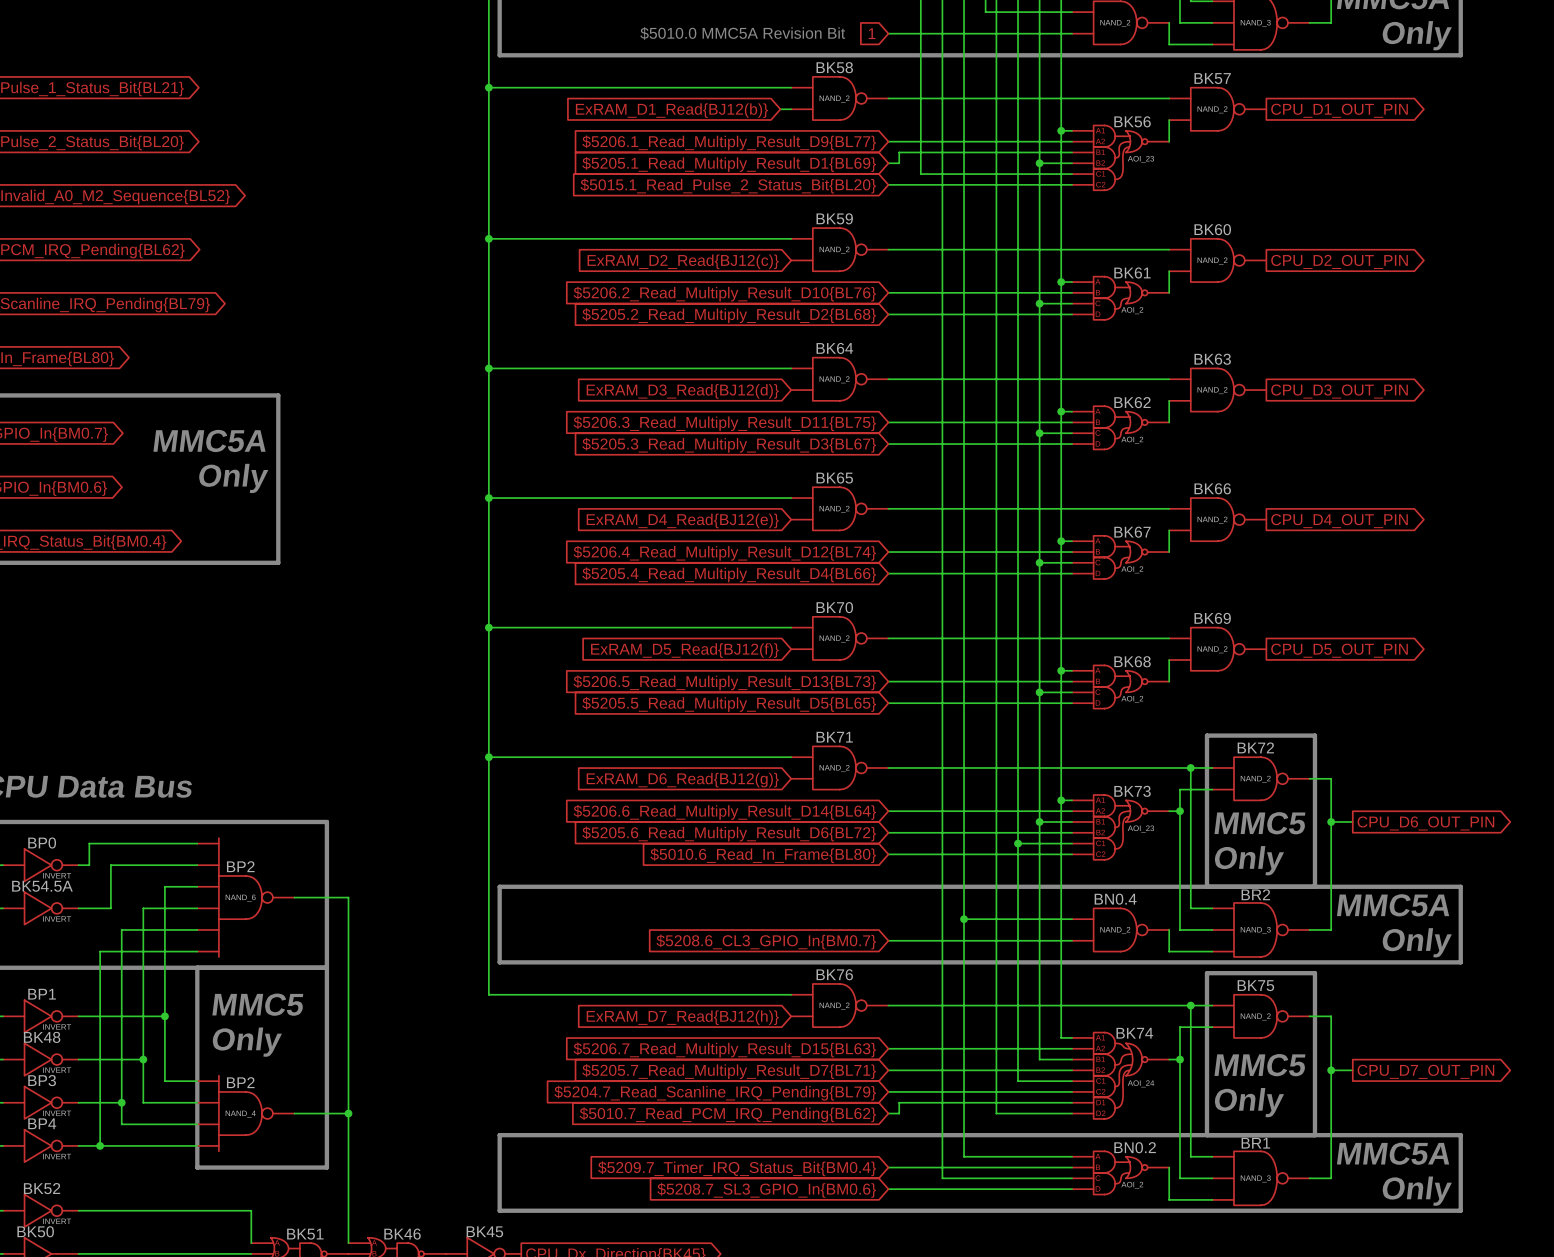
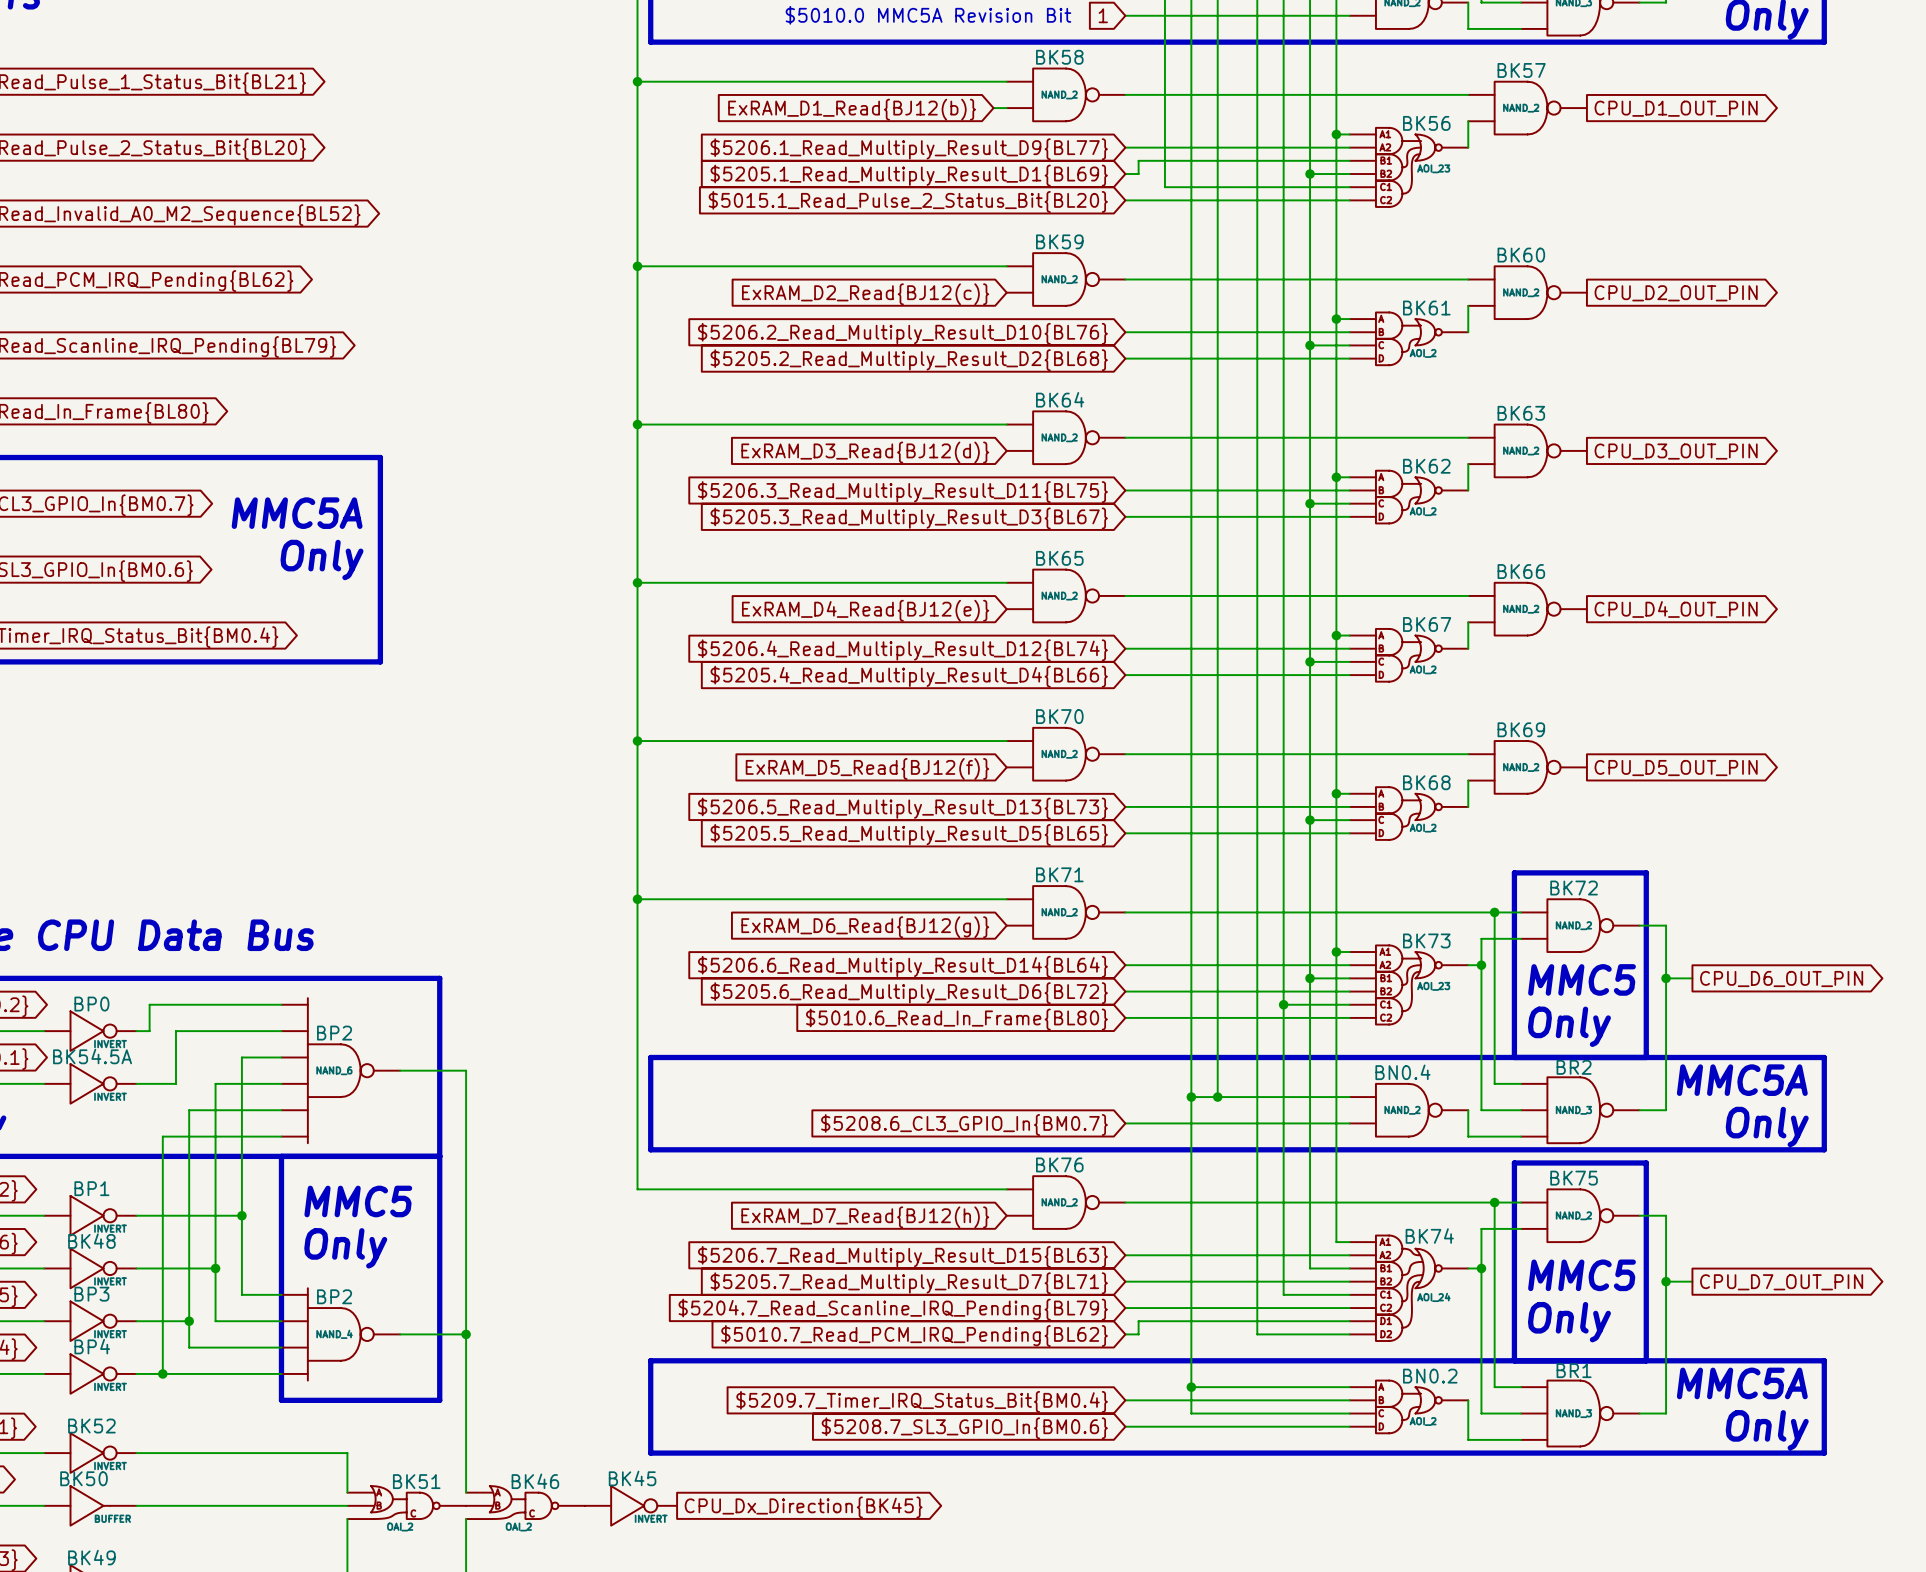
junction: none -> (1191, 1097)
wire: (964, 919) (964, 1156) -> (1217, 1097) (1191, 1097)
wire: none -> (1191, 1387) (1217, 1387)
junction: none -> (1191, 1387)

